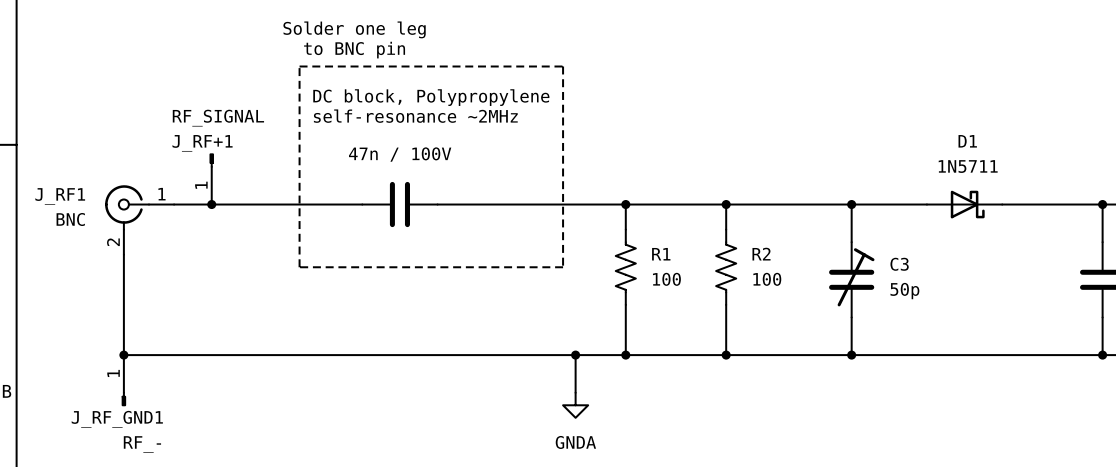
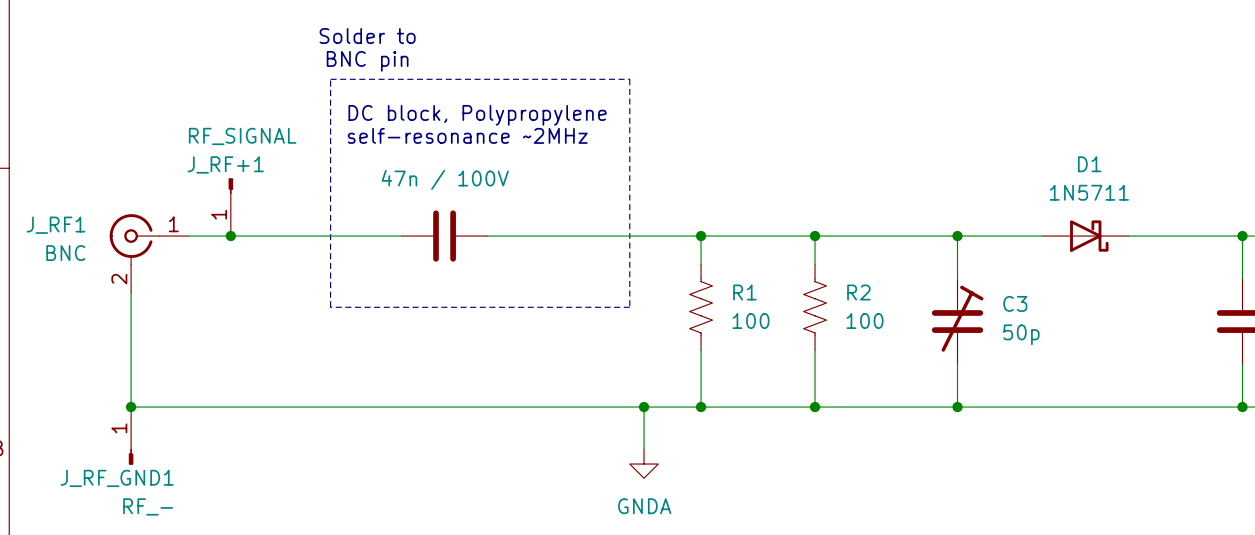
text: Solder one leg (354, 29) -> Solder to (367, 36)
text: to BNC pin (354, 50) -> BNC pin (367, 61)

